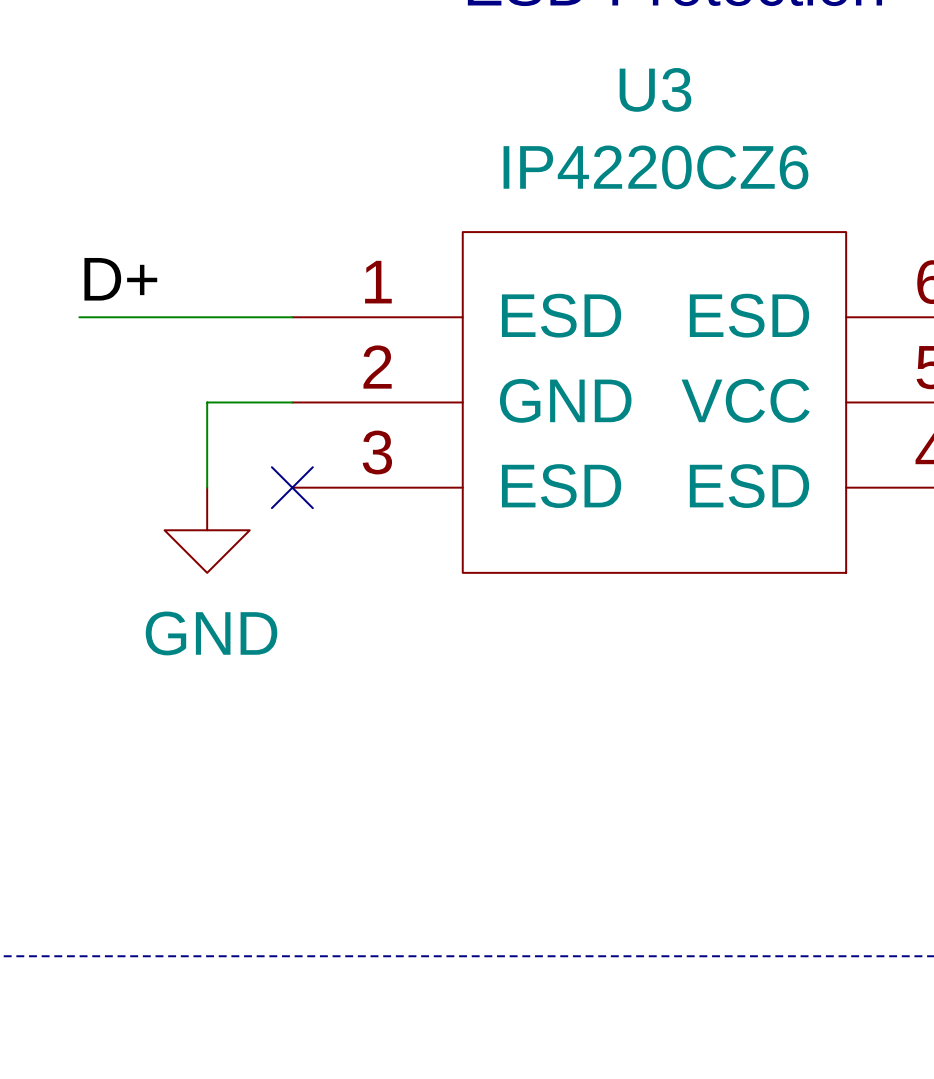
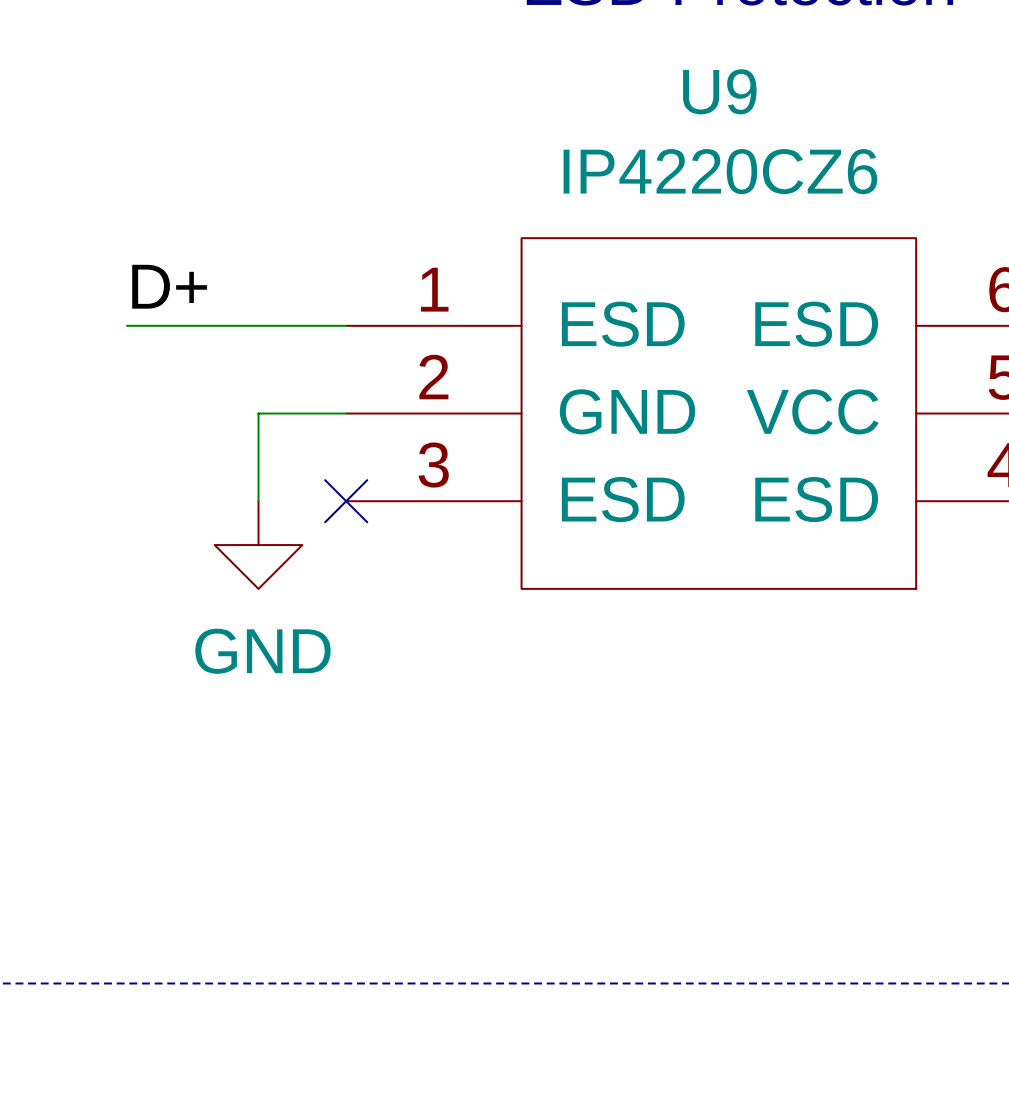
U3 name: U3 (655, 89) -> U9 (719, 91)

